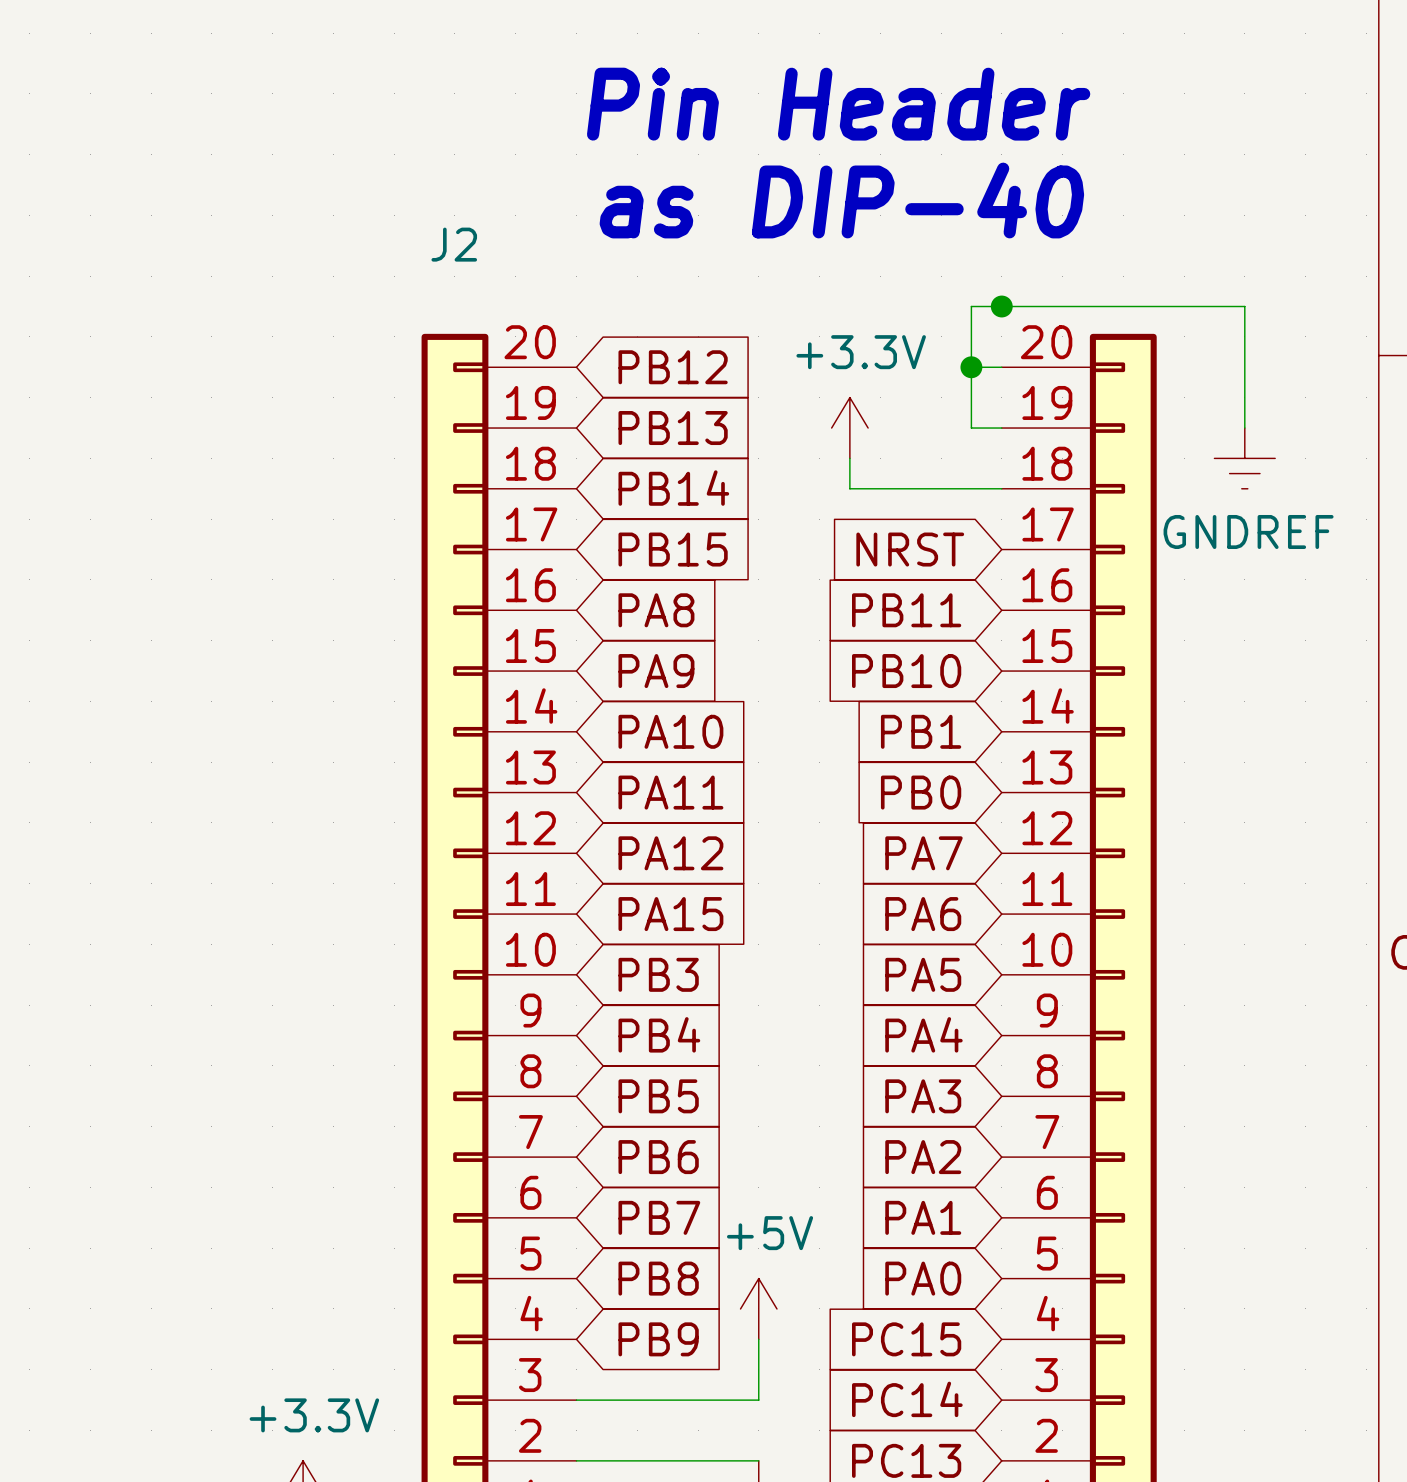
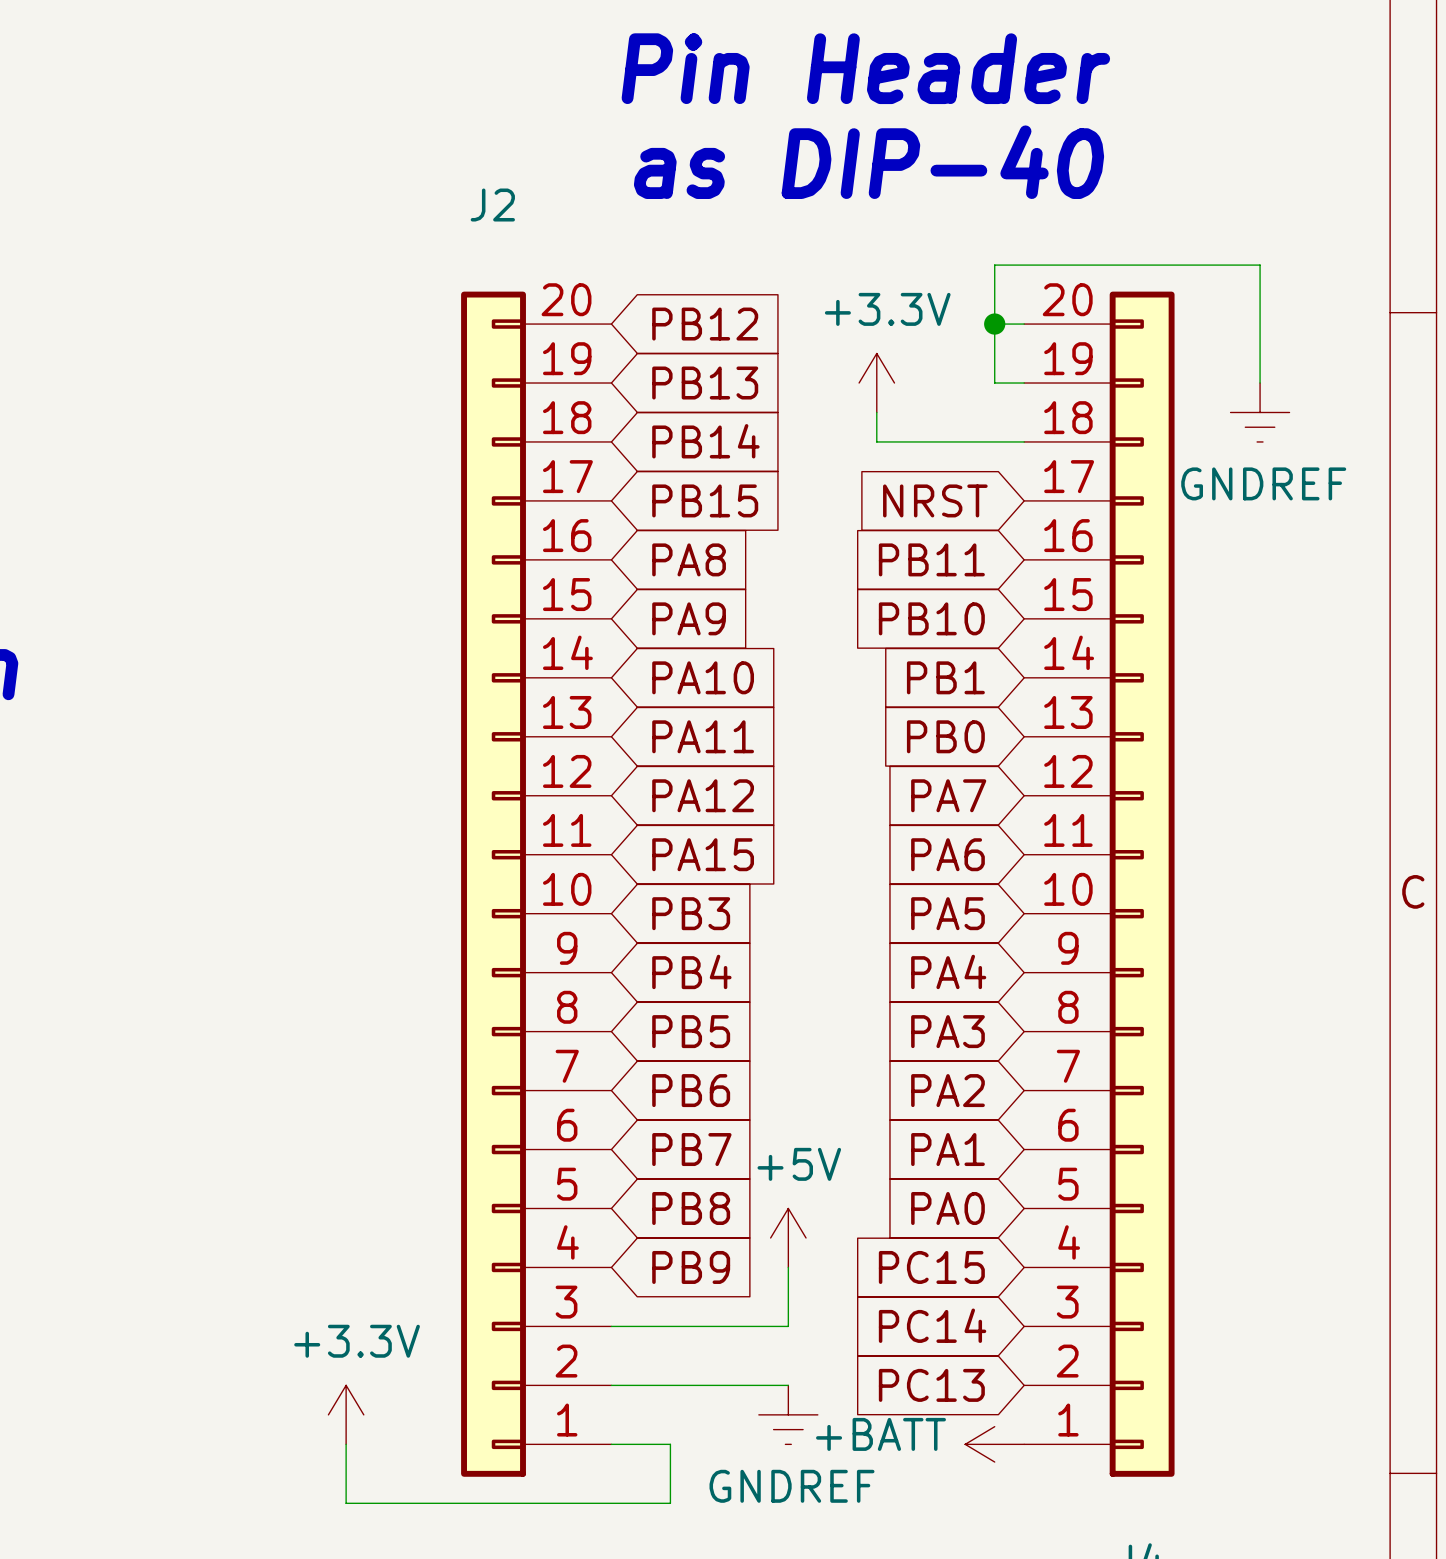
junction: (1001, 306) -> none

